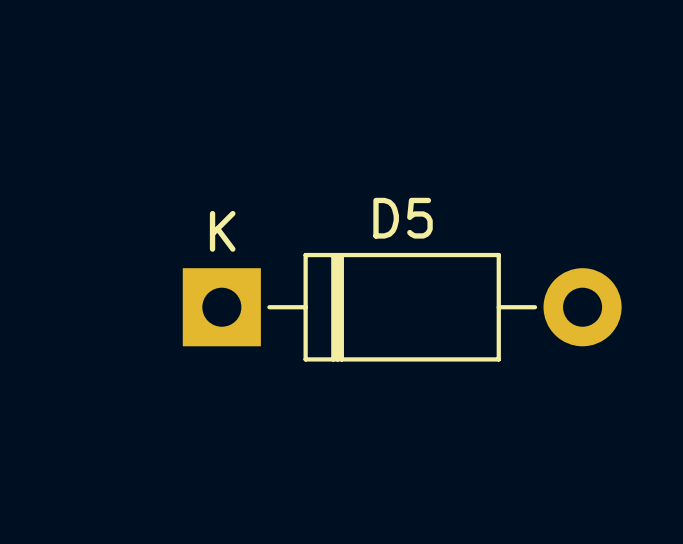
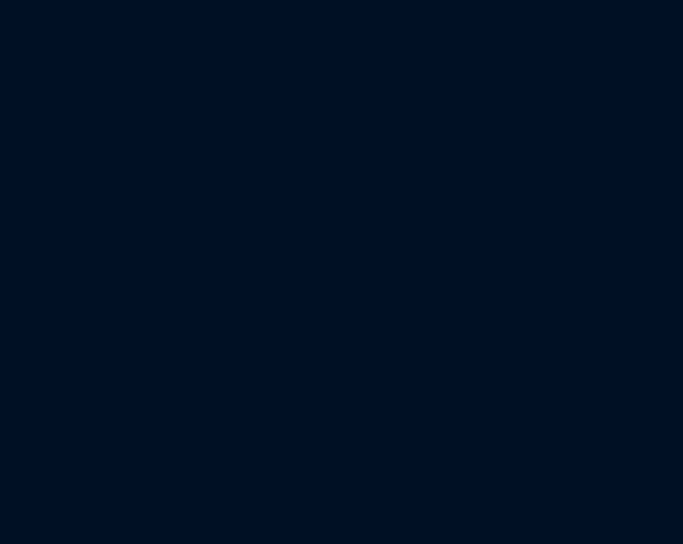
D5: (402, 307) -> none

